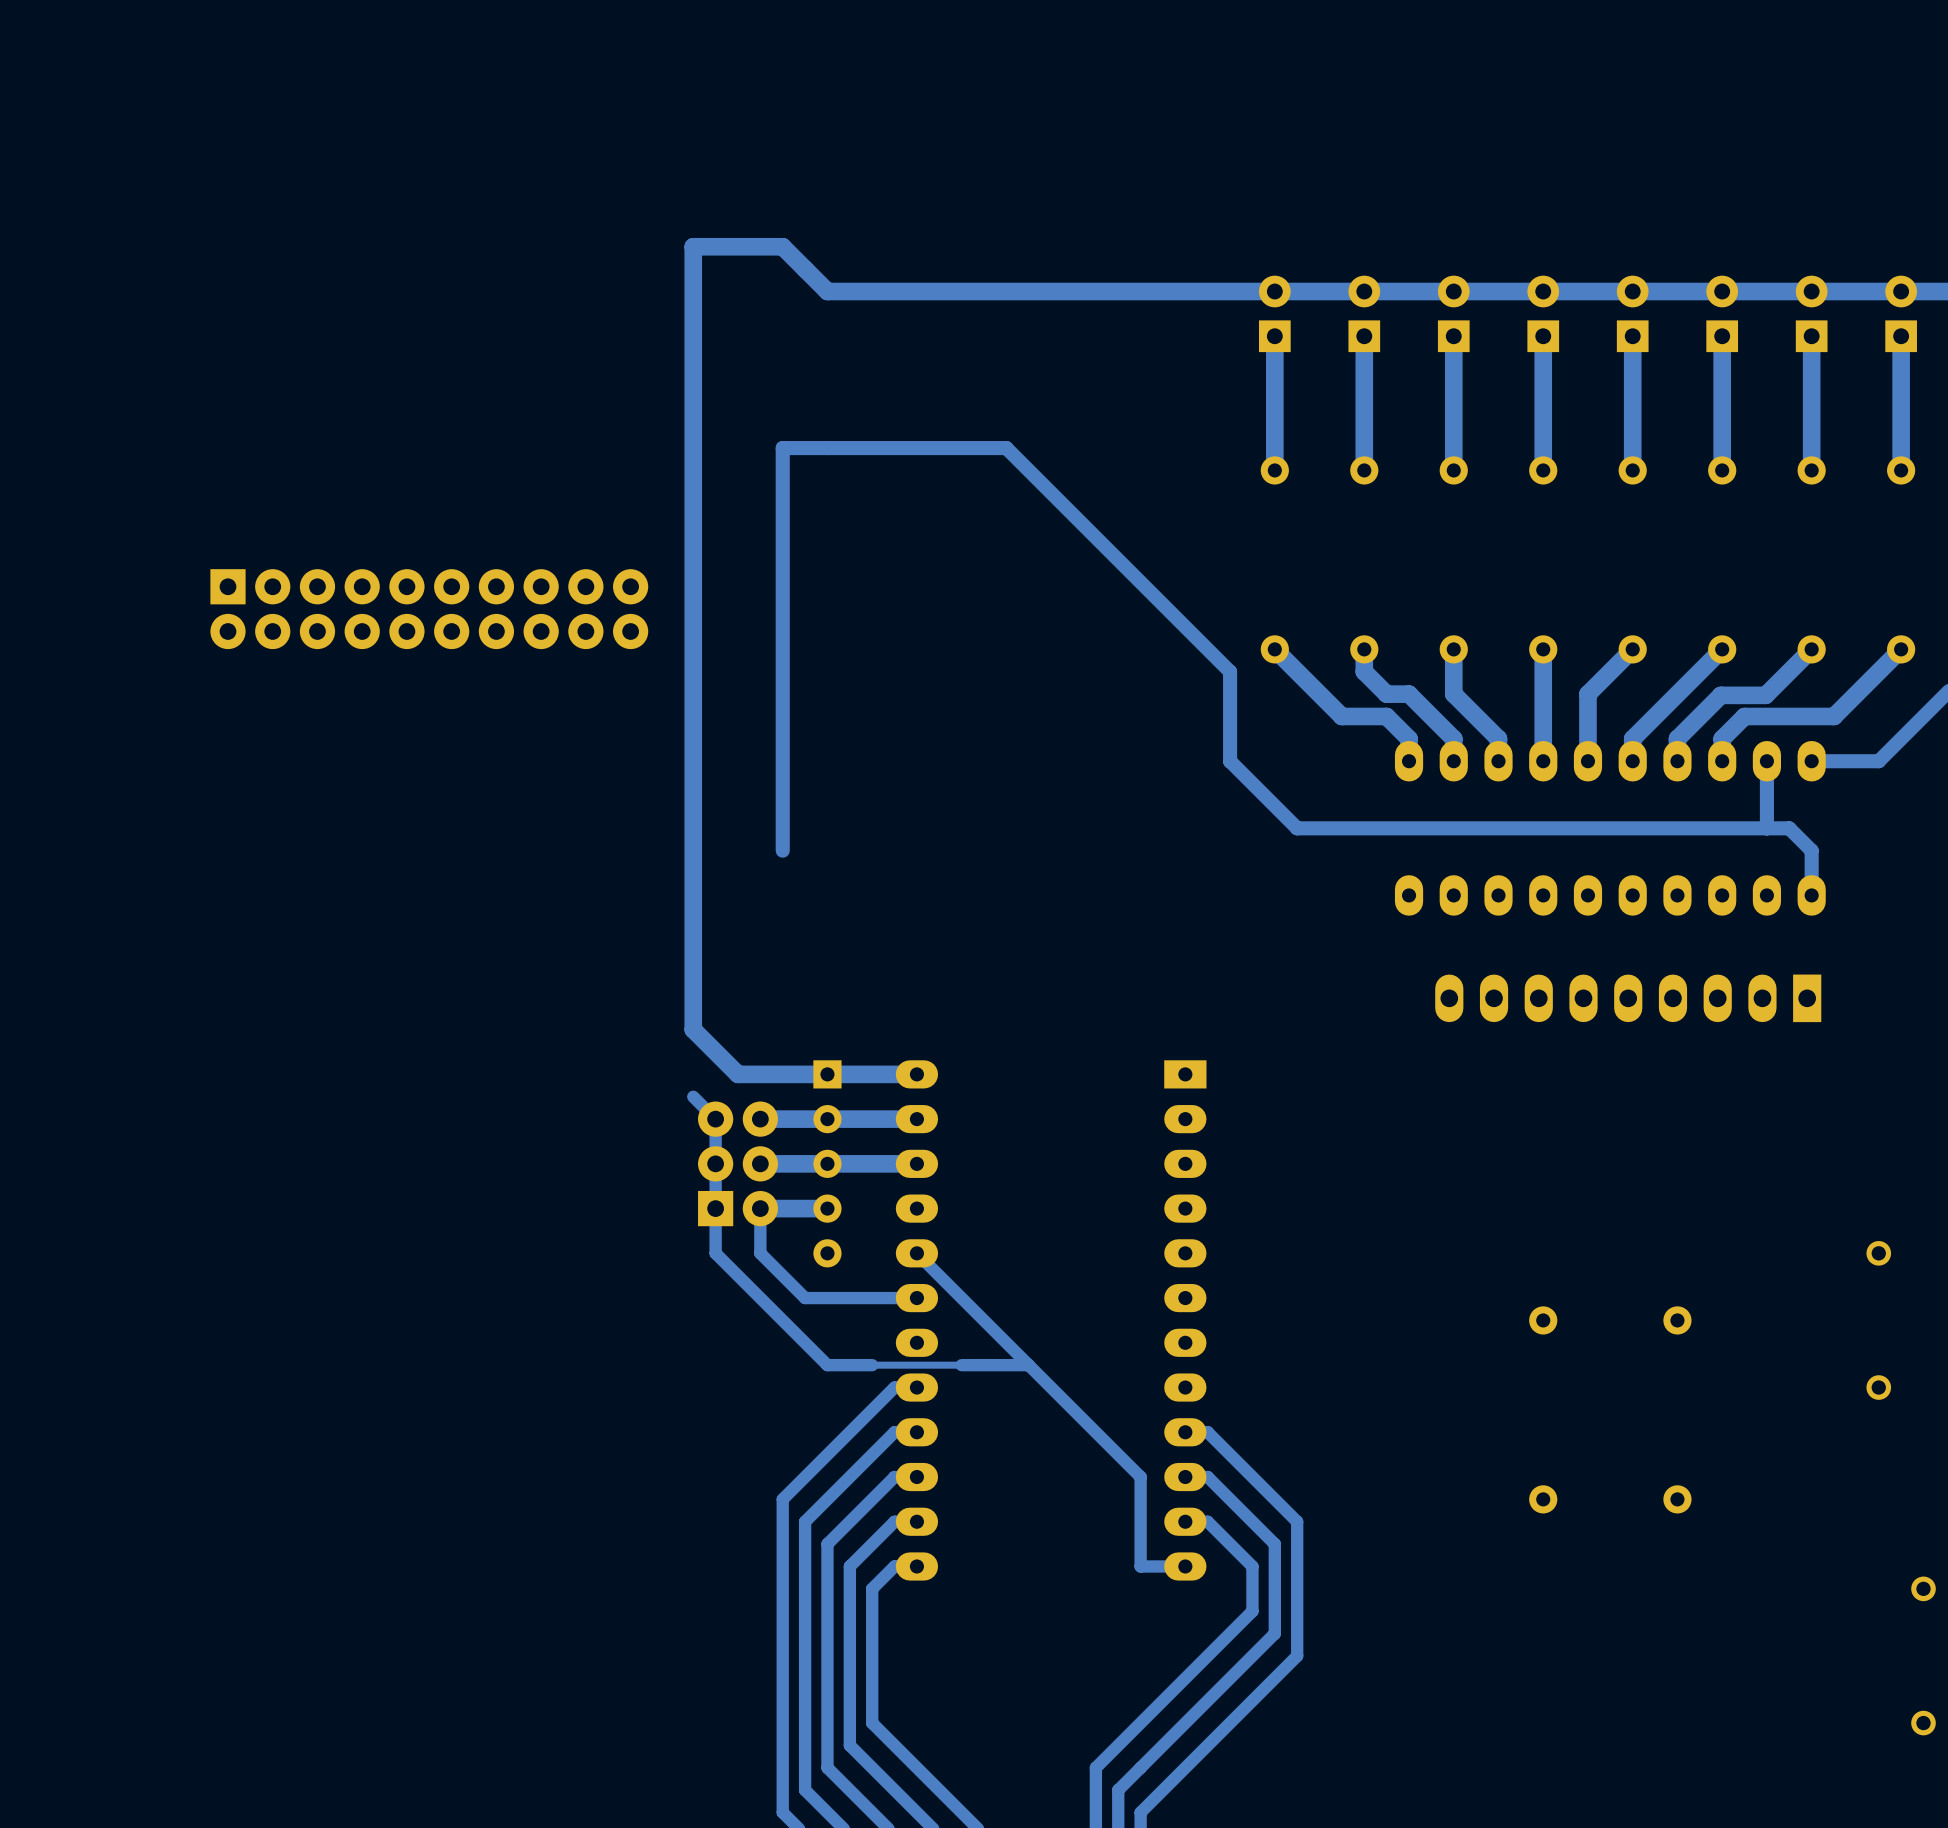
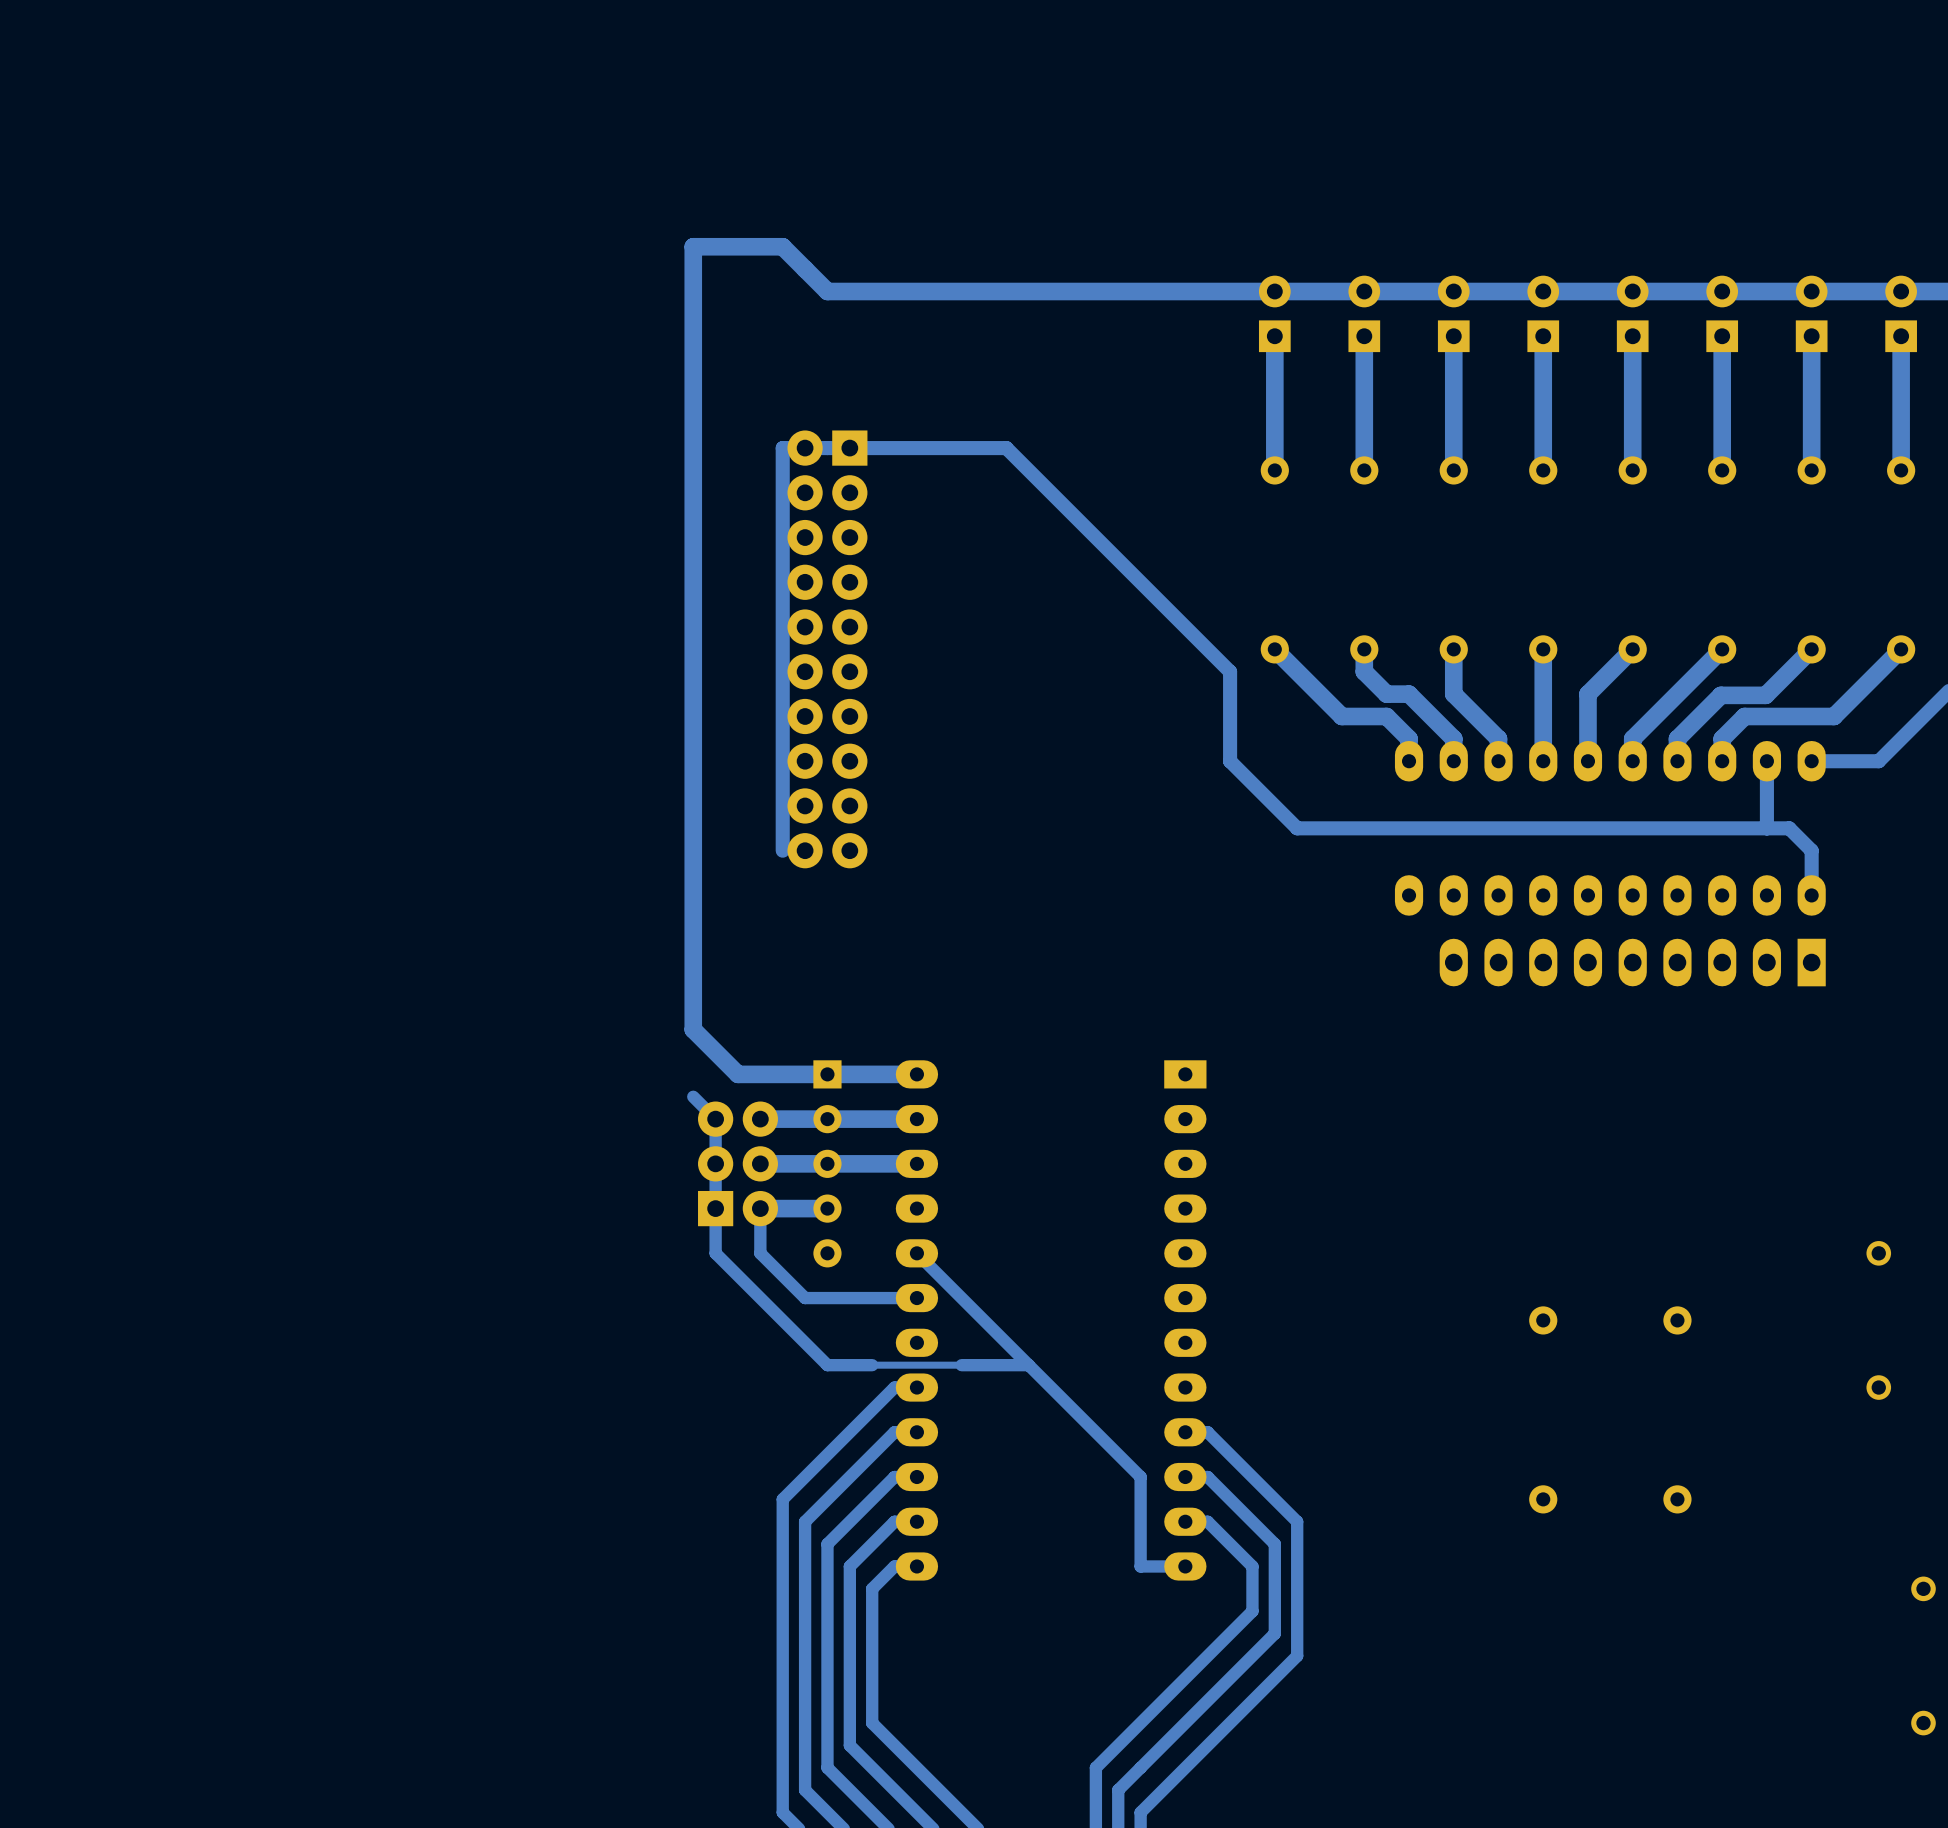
part rotation: 0° (429, 609) -> 90° clockwise (827, 649)
part position: (429, 609) -> (827, 649)
part position: (1628, 998) -> (1632, 962)

